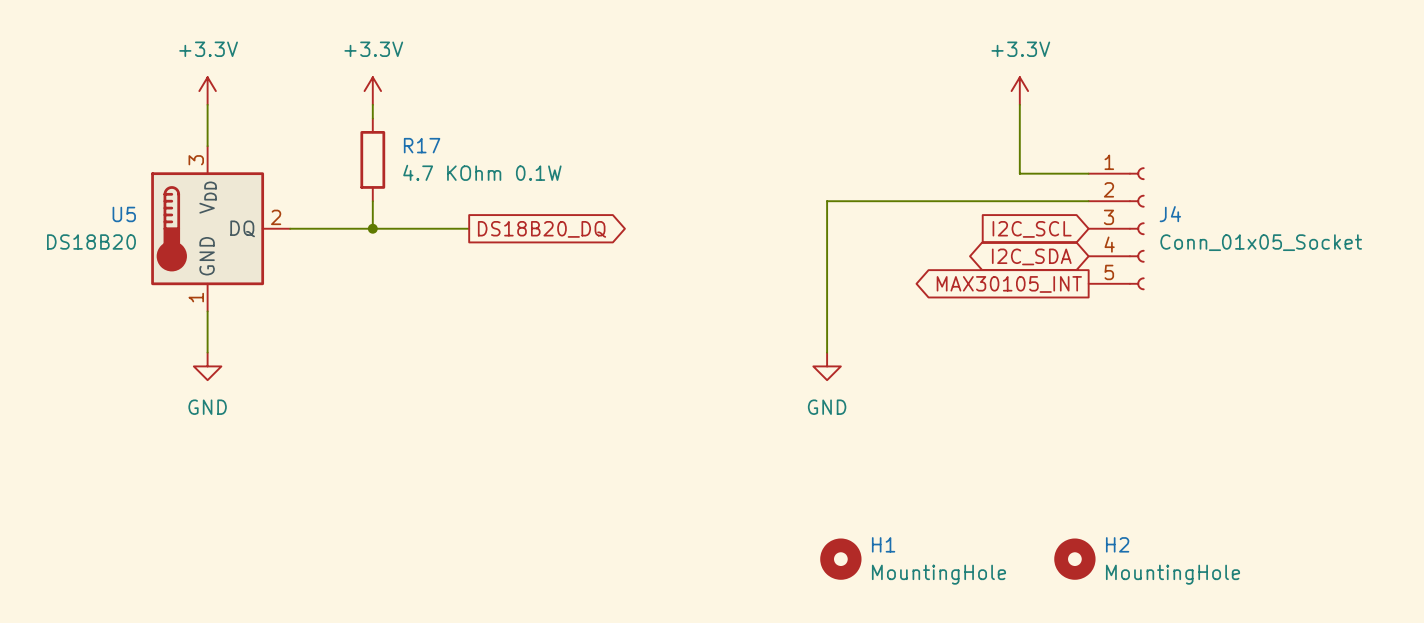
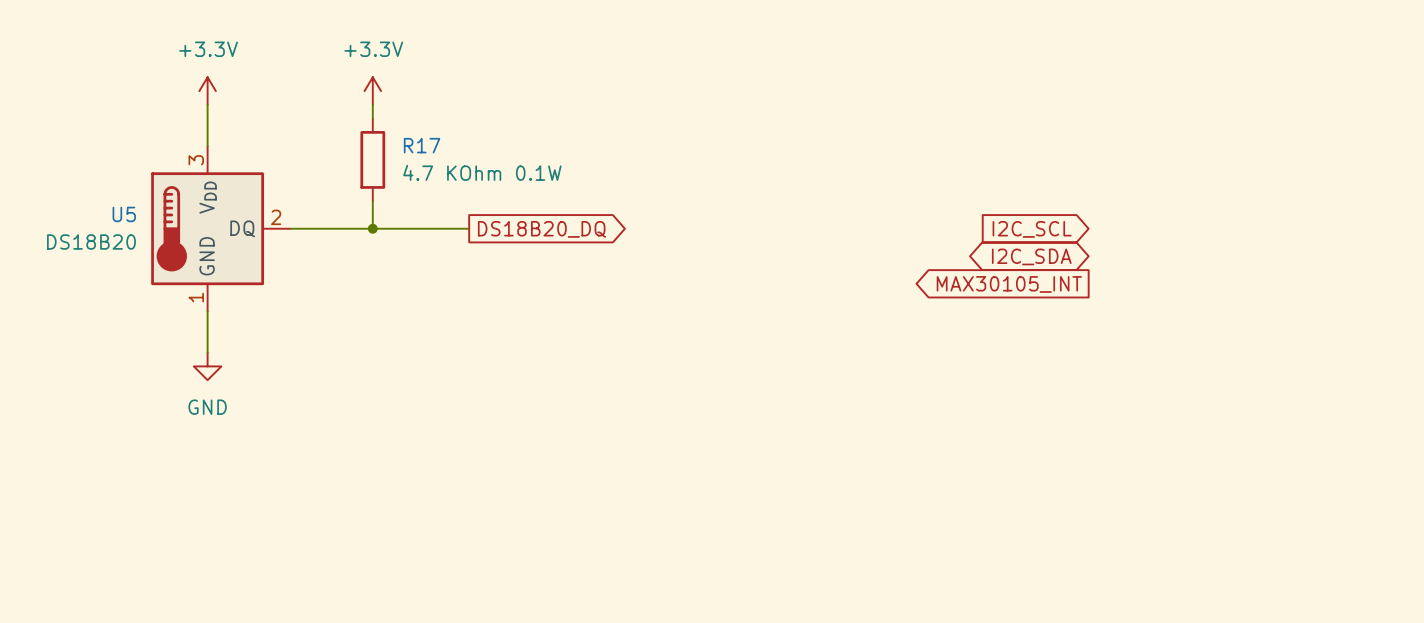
power symbol: +3.3V (1019, 91) -> none
wire: (1019, 104) (1019, 173) (1088, 173) -> none
wire: (1088, 201) (827, 201) (827, 352) -> none
J4: Conn_01x05_Socket (1116, 228) -> none
power symbol: GND (827, 366) -> none
H1: MountingHole (840, 559) -> none
H2: MountingHole (1074, 559) -> none

